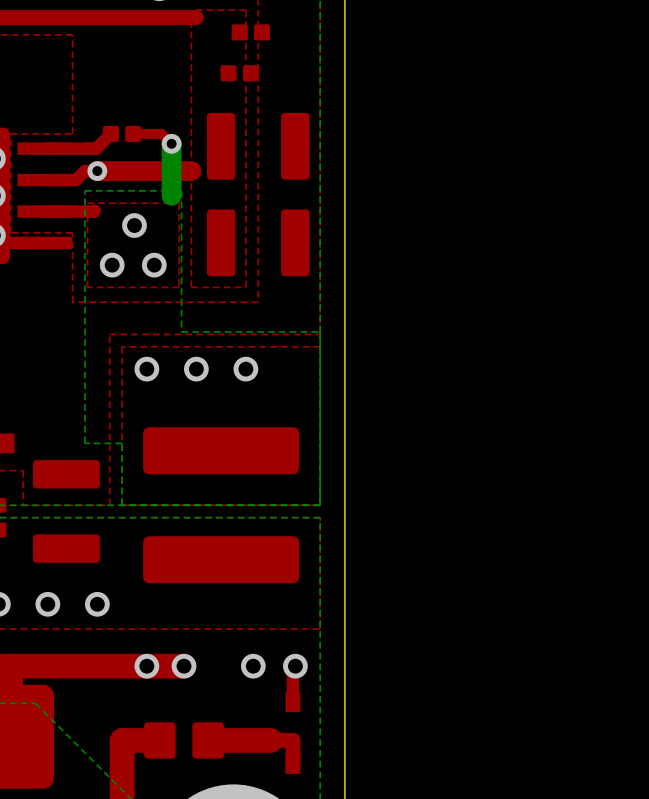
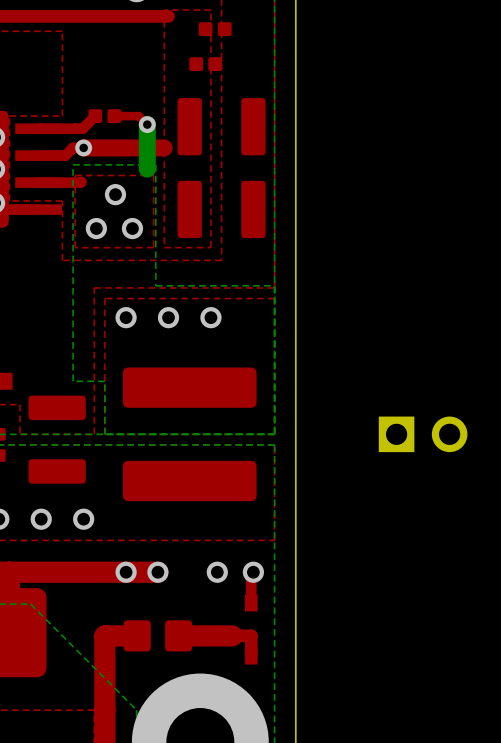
part: none -> (423, 434)

